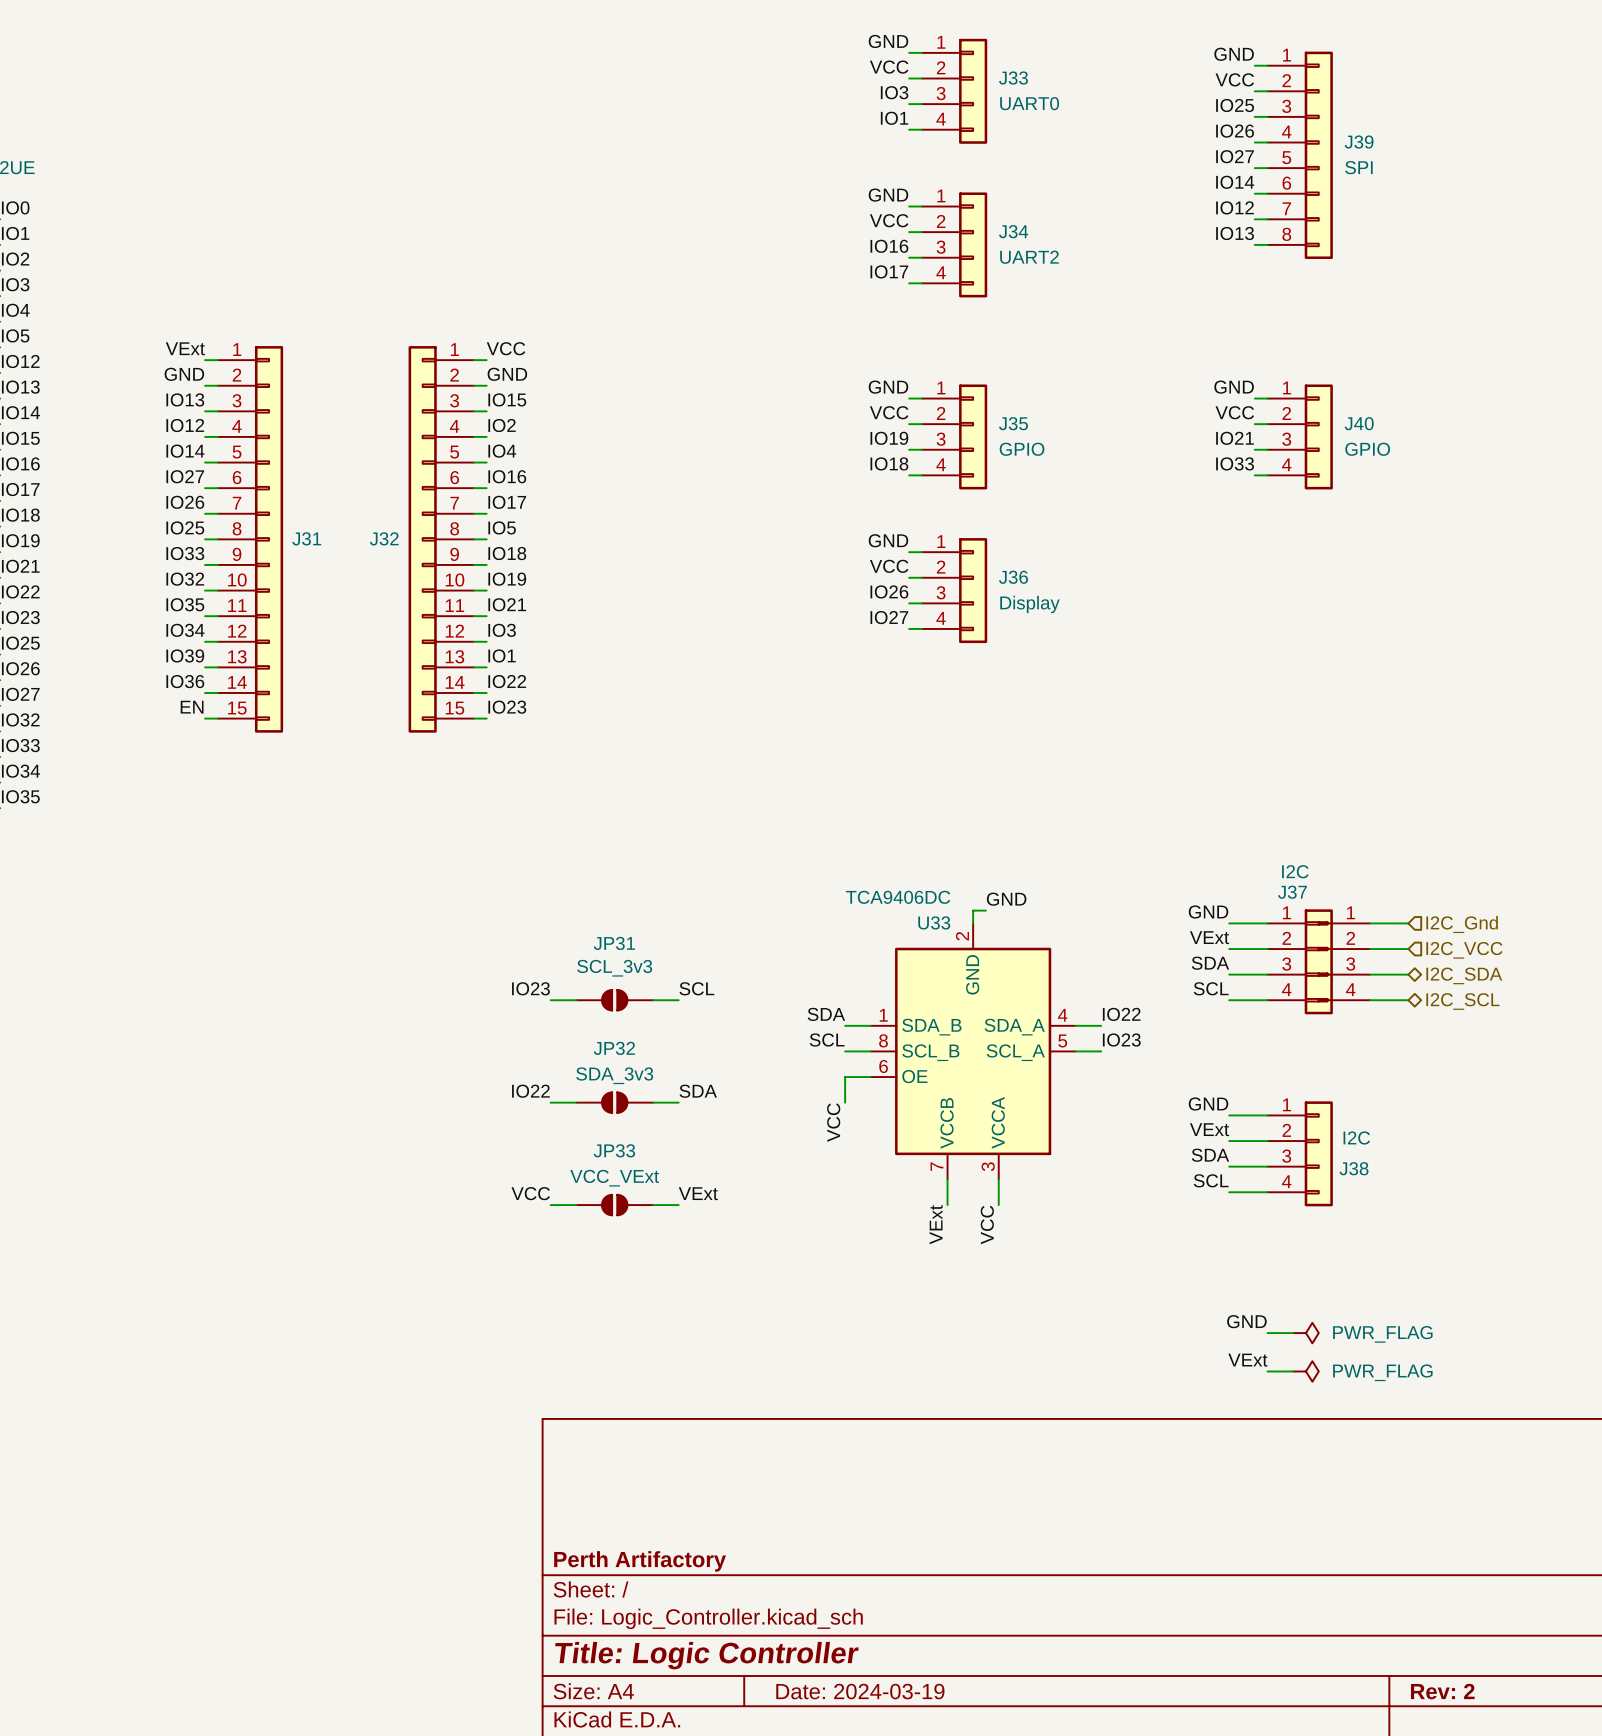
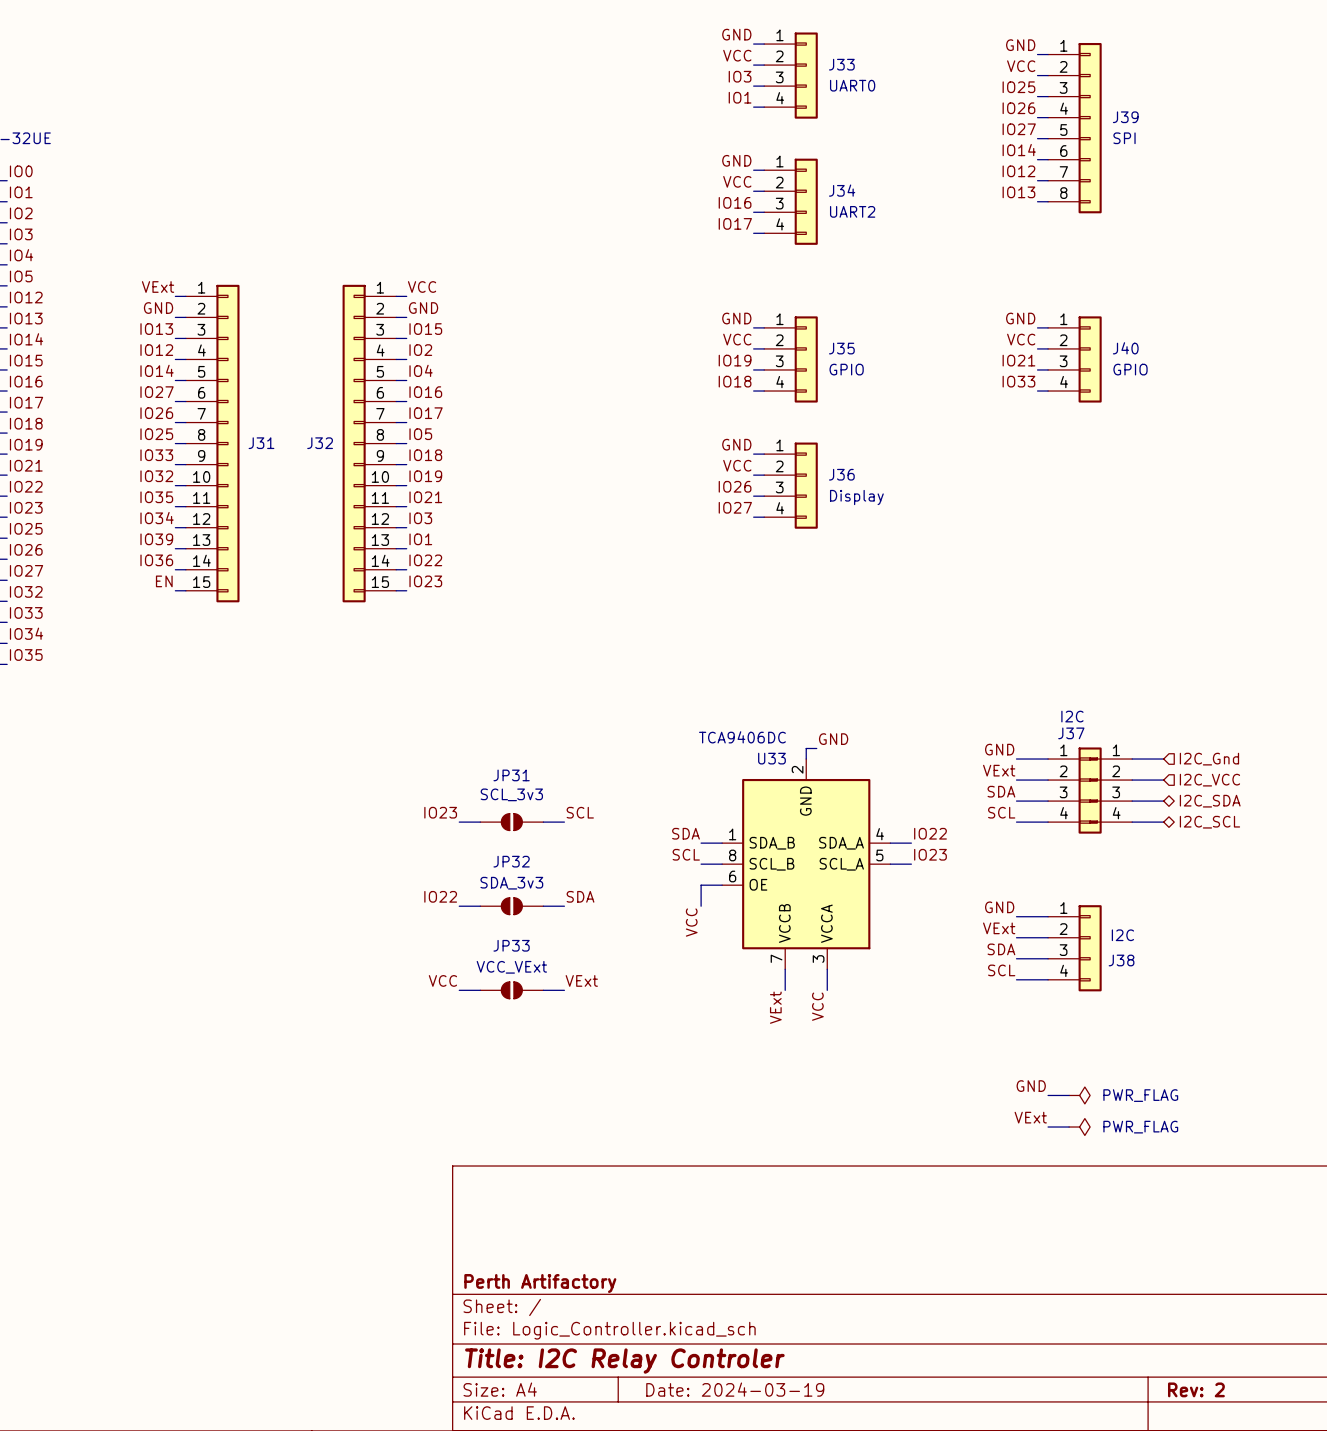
title block: Title: Logic Controller (706, 1655) -> Title: I2C Relay Controler (624, 1361)

